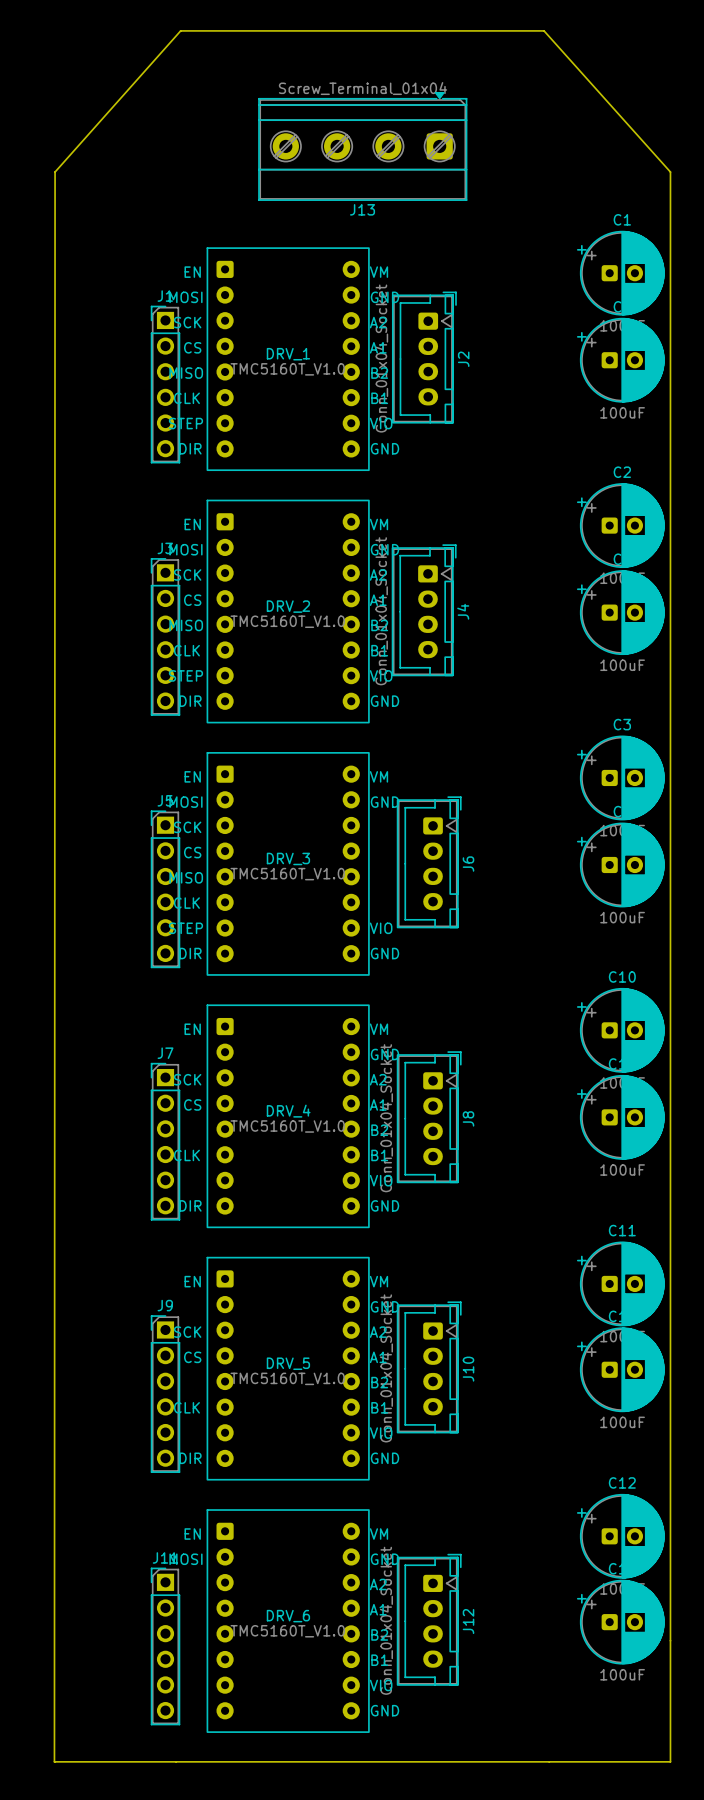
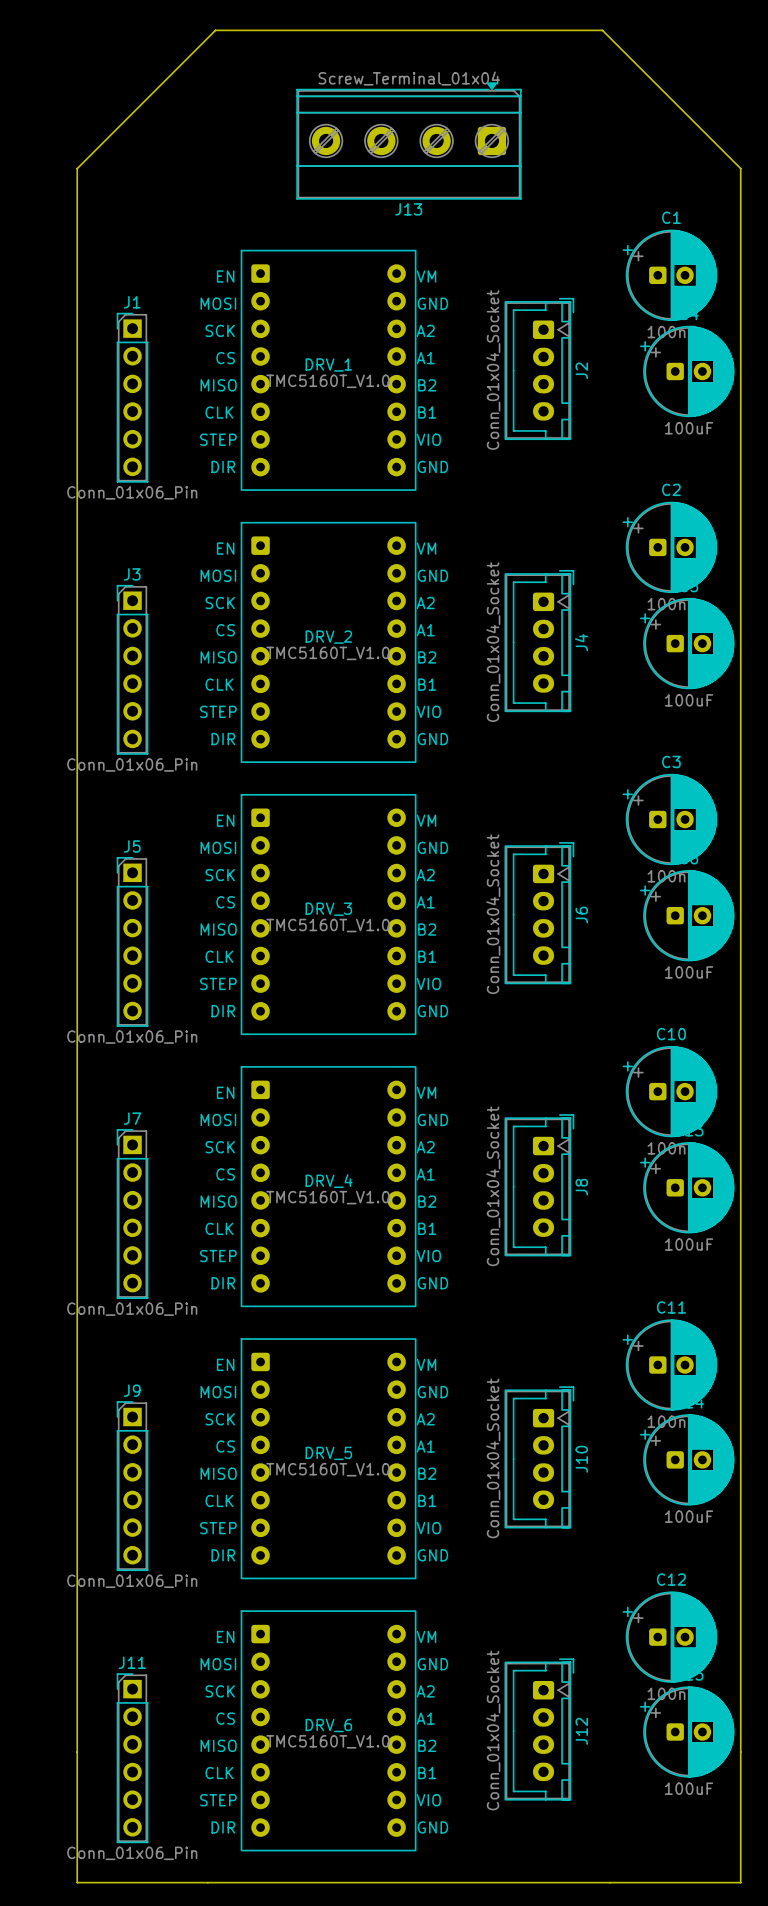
board edge: (670, 172) (544, 30) (180, 30) (55, 172) (55, 1761) -> (740, 168) (602, 30) (215, 30) (77, 168) (77, 1882)
C1 position: (620, 273) -> (669, 275)
J2 position: (424, 357) -> (539, 368)
J1 position: (165, 384) -> (132, 397)
J1 value: none -> Conn_01x06_Pin (132, 492)
C2 position: (620, 525) -> (669, 547)
J4 position: (424, 610) -> (539, 641)
J3 position: (165, 636) -> (132, 669)
J3 value: none -> Conn_01x06_Pin (132, 764)
C3 position: (620, 777) -> (669, 819)
DRV_3 text: none -> A2 (425, 875)
DRV_3 text: none -> A1 (425, 902)
J6 position: (429, 862) -> (539, 913)
J6 value: none -> Conn_01x04_Socket (493, 914)
DRV_3 text: none -> B2 (427, 929)
J5 position: (165, 889) -> (132, 941)
DRV_3 text: none -> B1 (427, 956)
J5 value: none -> Conn_01x06_Pin (132, 1037)
C10 position: (620, 1030) -> (669, 1091)
DRV_4 text: none -> MOSI (218, 1119)
J8 position: (429, 1117) -> (539, 1185)
DRV_4 text: none -> MISO (218, 1201)
J7 position: (165, 1141) -> (132, 1214)
DRV_4 text: none -> STEP (218, 1256)
J7 value: none -> Conn_01x06_Pin (132, 1309)
C11 position: (620, 1283) -> (669, 1365)
DRV_5 text: none -> MOSI (218, 1392)
J10 position: (429, 1367) -> (539, 1457)
DRV_5 text: none -> MISO (218, 1473)
J9 position: (165, 1394) -> (132, 1486)
DRV_5 text: none -> STEP (218, 1528)
J9 value: none -> Conn_01x06_Pin (132, 1581)
C12 position: (620, 1536) -> (669, 1637)
DRV_6 text: none -> SCK (220, 1691)
DRV_6 text: none -> CS (225, 1718)
J12 position: (429, 1619) -> (539, 1729)
DRV_6 text: none -> MISO (218, 1745)
J11 position: (165, 1646) -> (132, 1758)
DRV_6 text: none -> CLK (219, 1773)
DRV_6 text: none -> STEP (218, 1800)
DRV_6 text: none -> DIR (223, 1827)
J11 value: none -> Conn_01x06_Pin (132, 1853)

